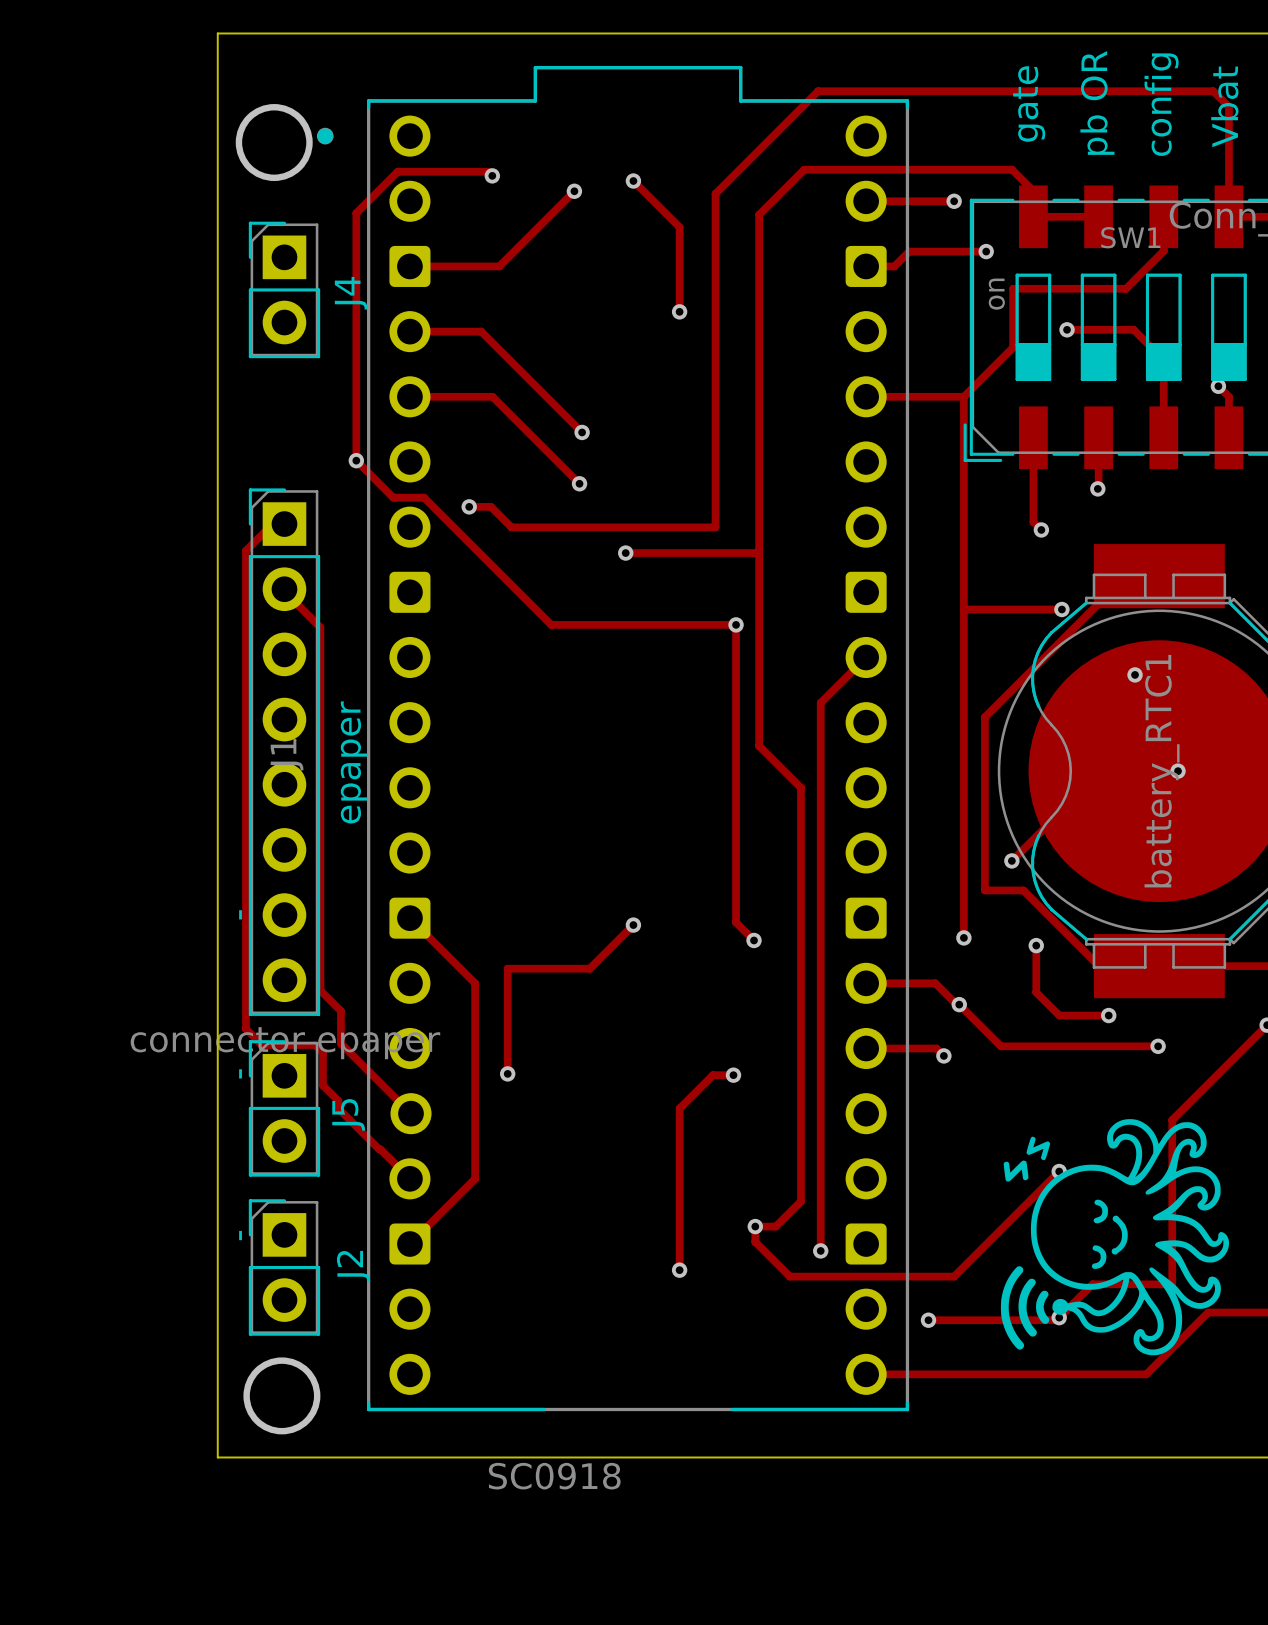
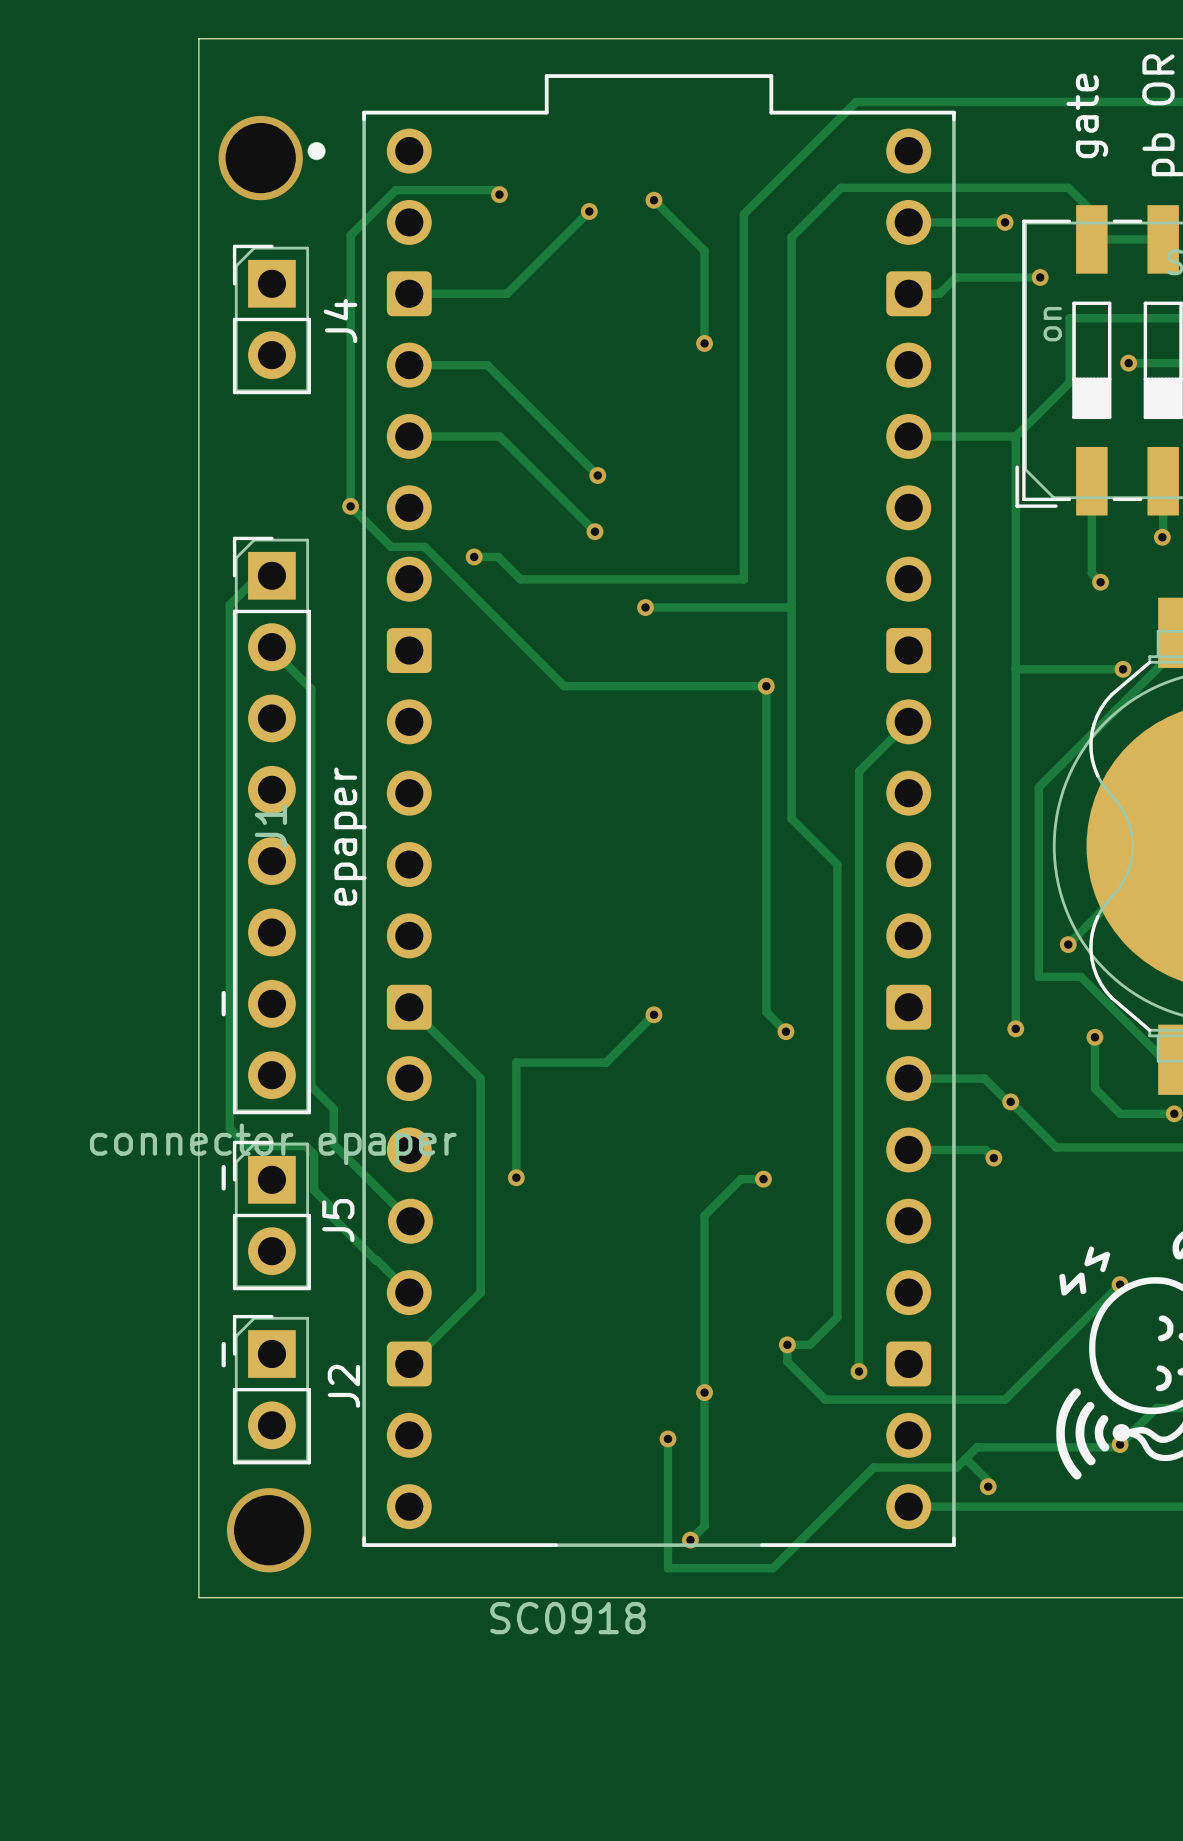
track: none -> (704, 1392) (704, 1526) (690, 1540)
track: none -> (668, 1438) (668, 1568) (773, 1568) (873, 1467) (956, 1467) (976, 1447)
via: none -> (668, 1438)
via position: (928, 1320) -> (988, 1486)
track: none -> (965, 1458) (988, 1481) (988, 1486)
via: none -> (690, 1540)

